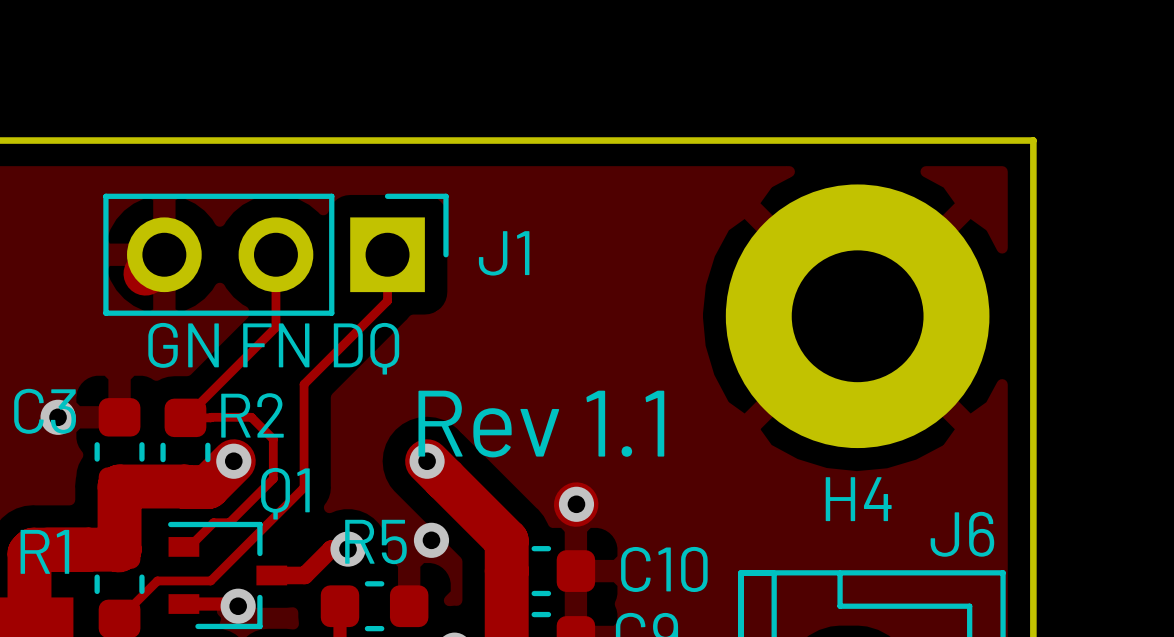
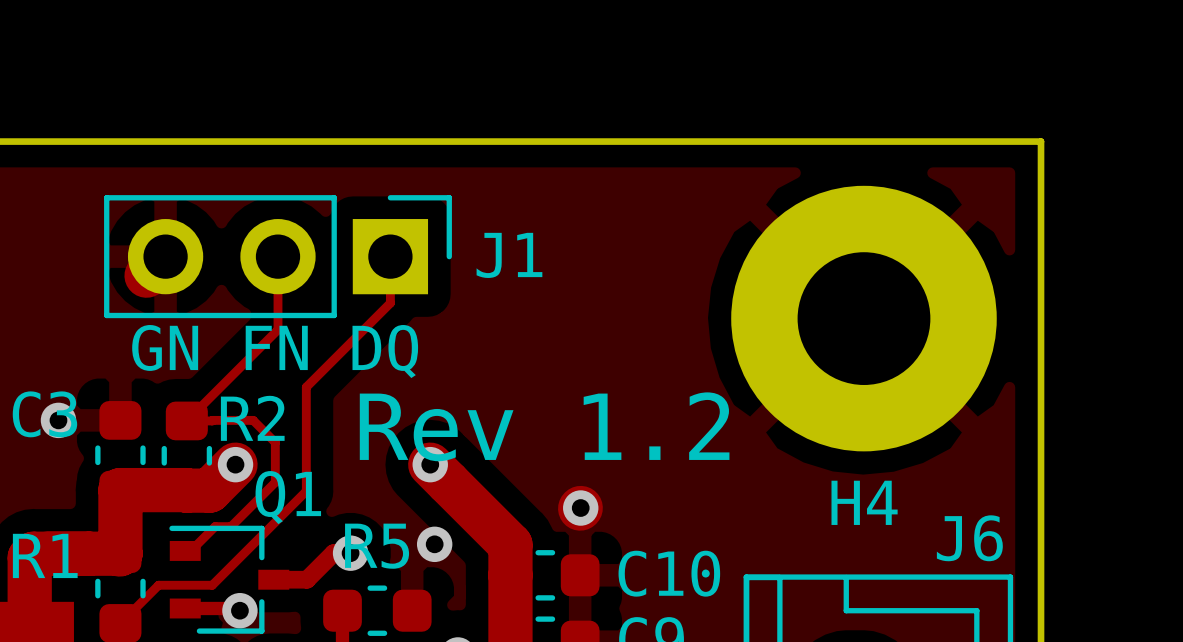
text: Rev 1.1 (541, 424) -> Rev 1.2 (544, 426)

